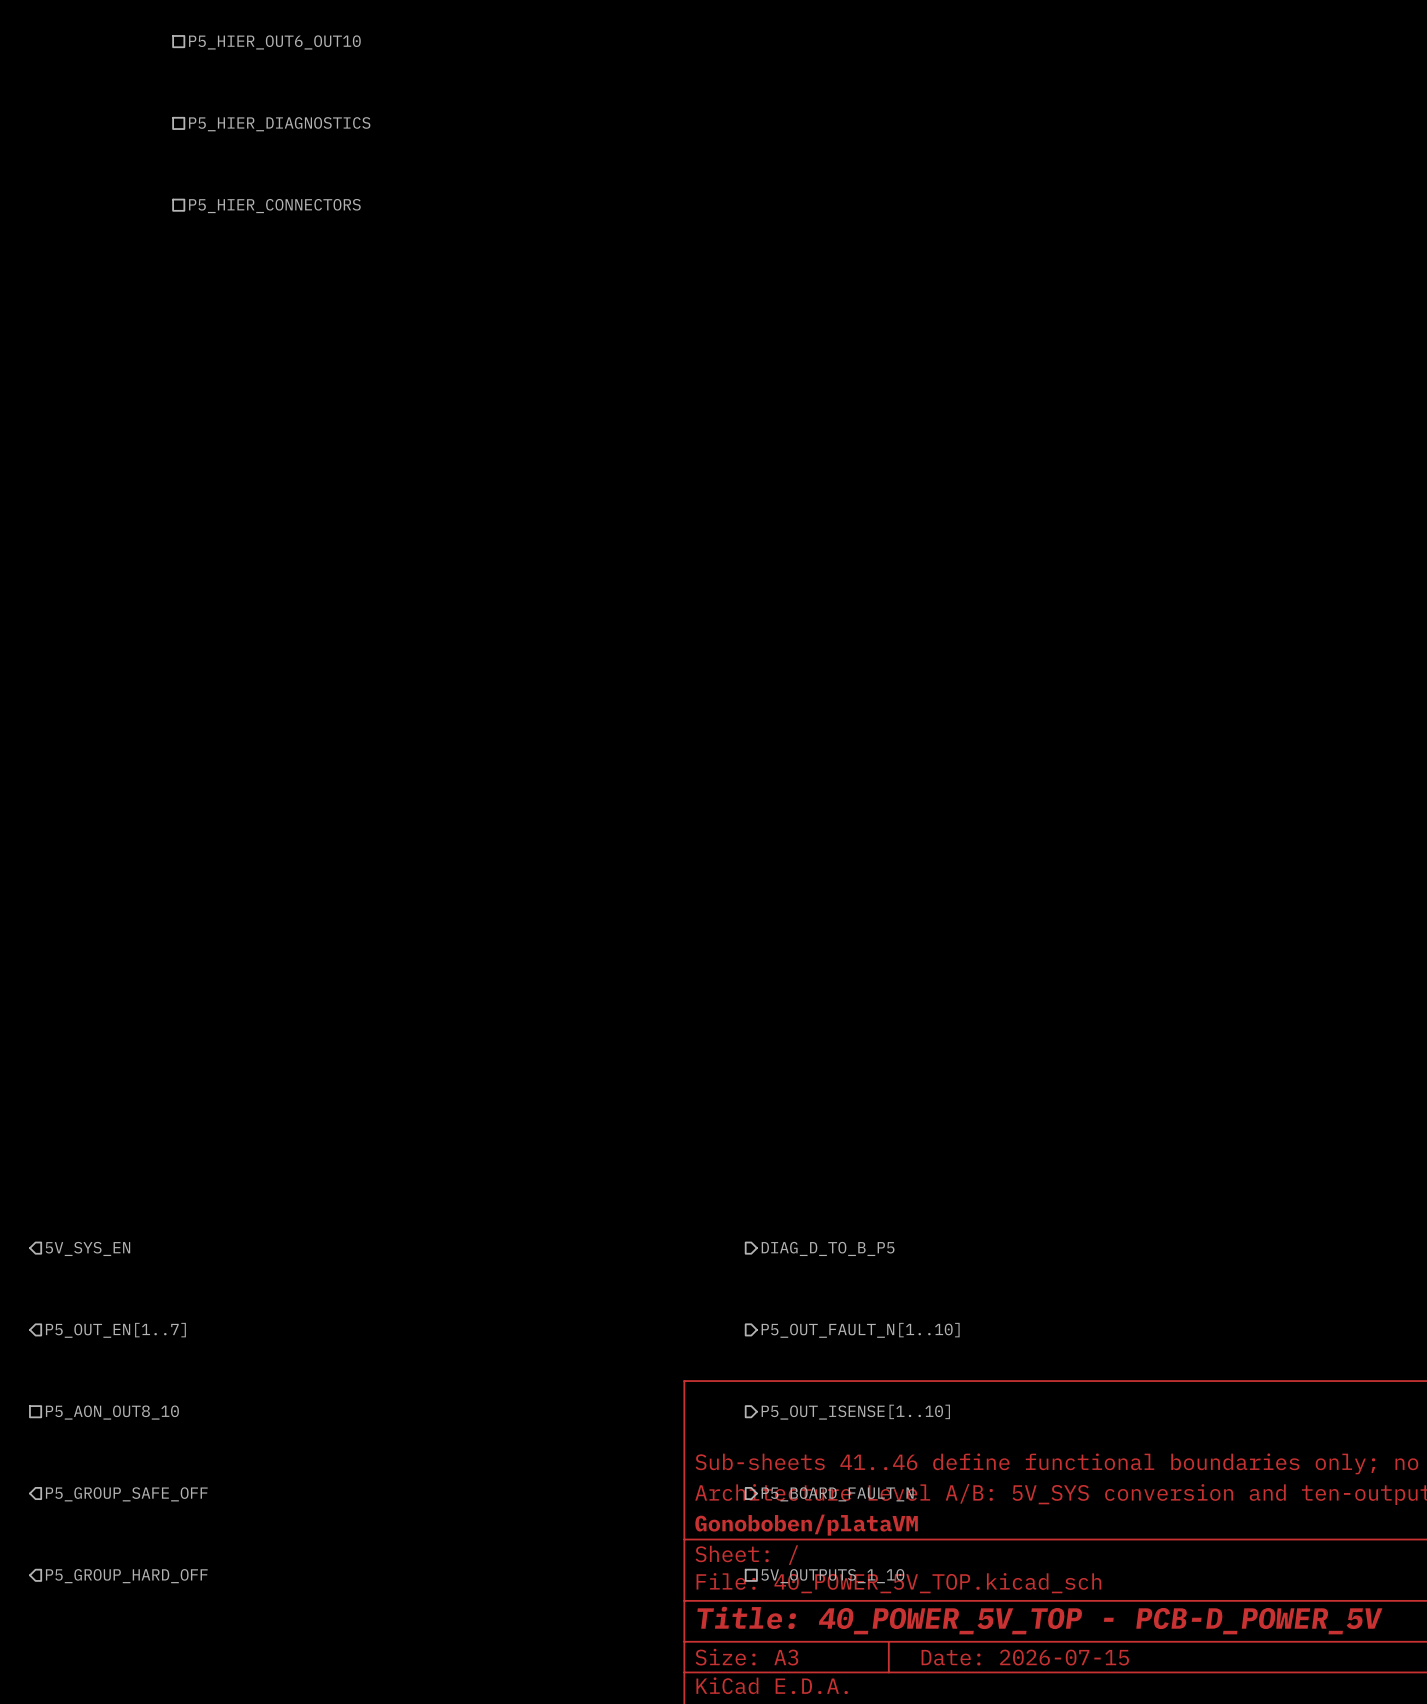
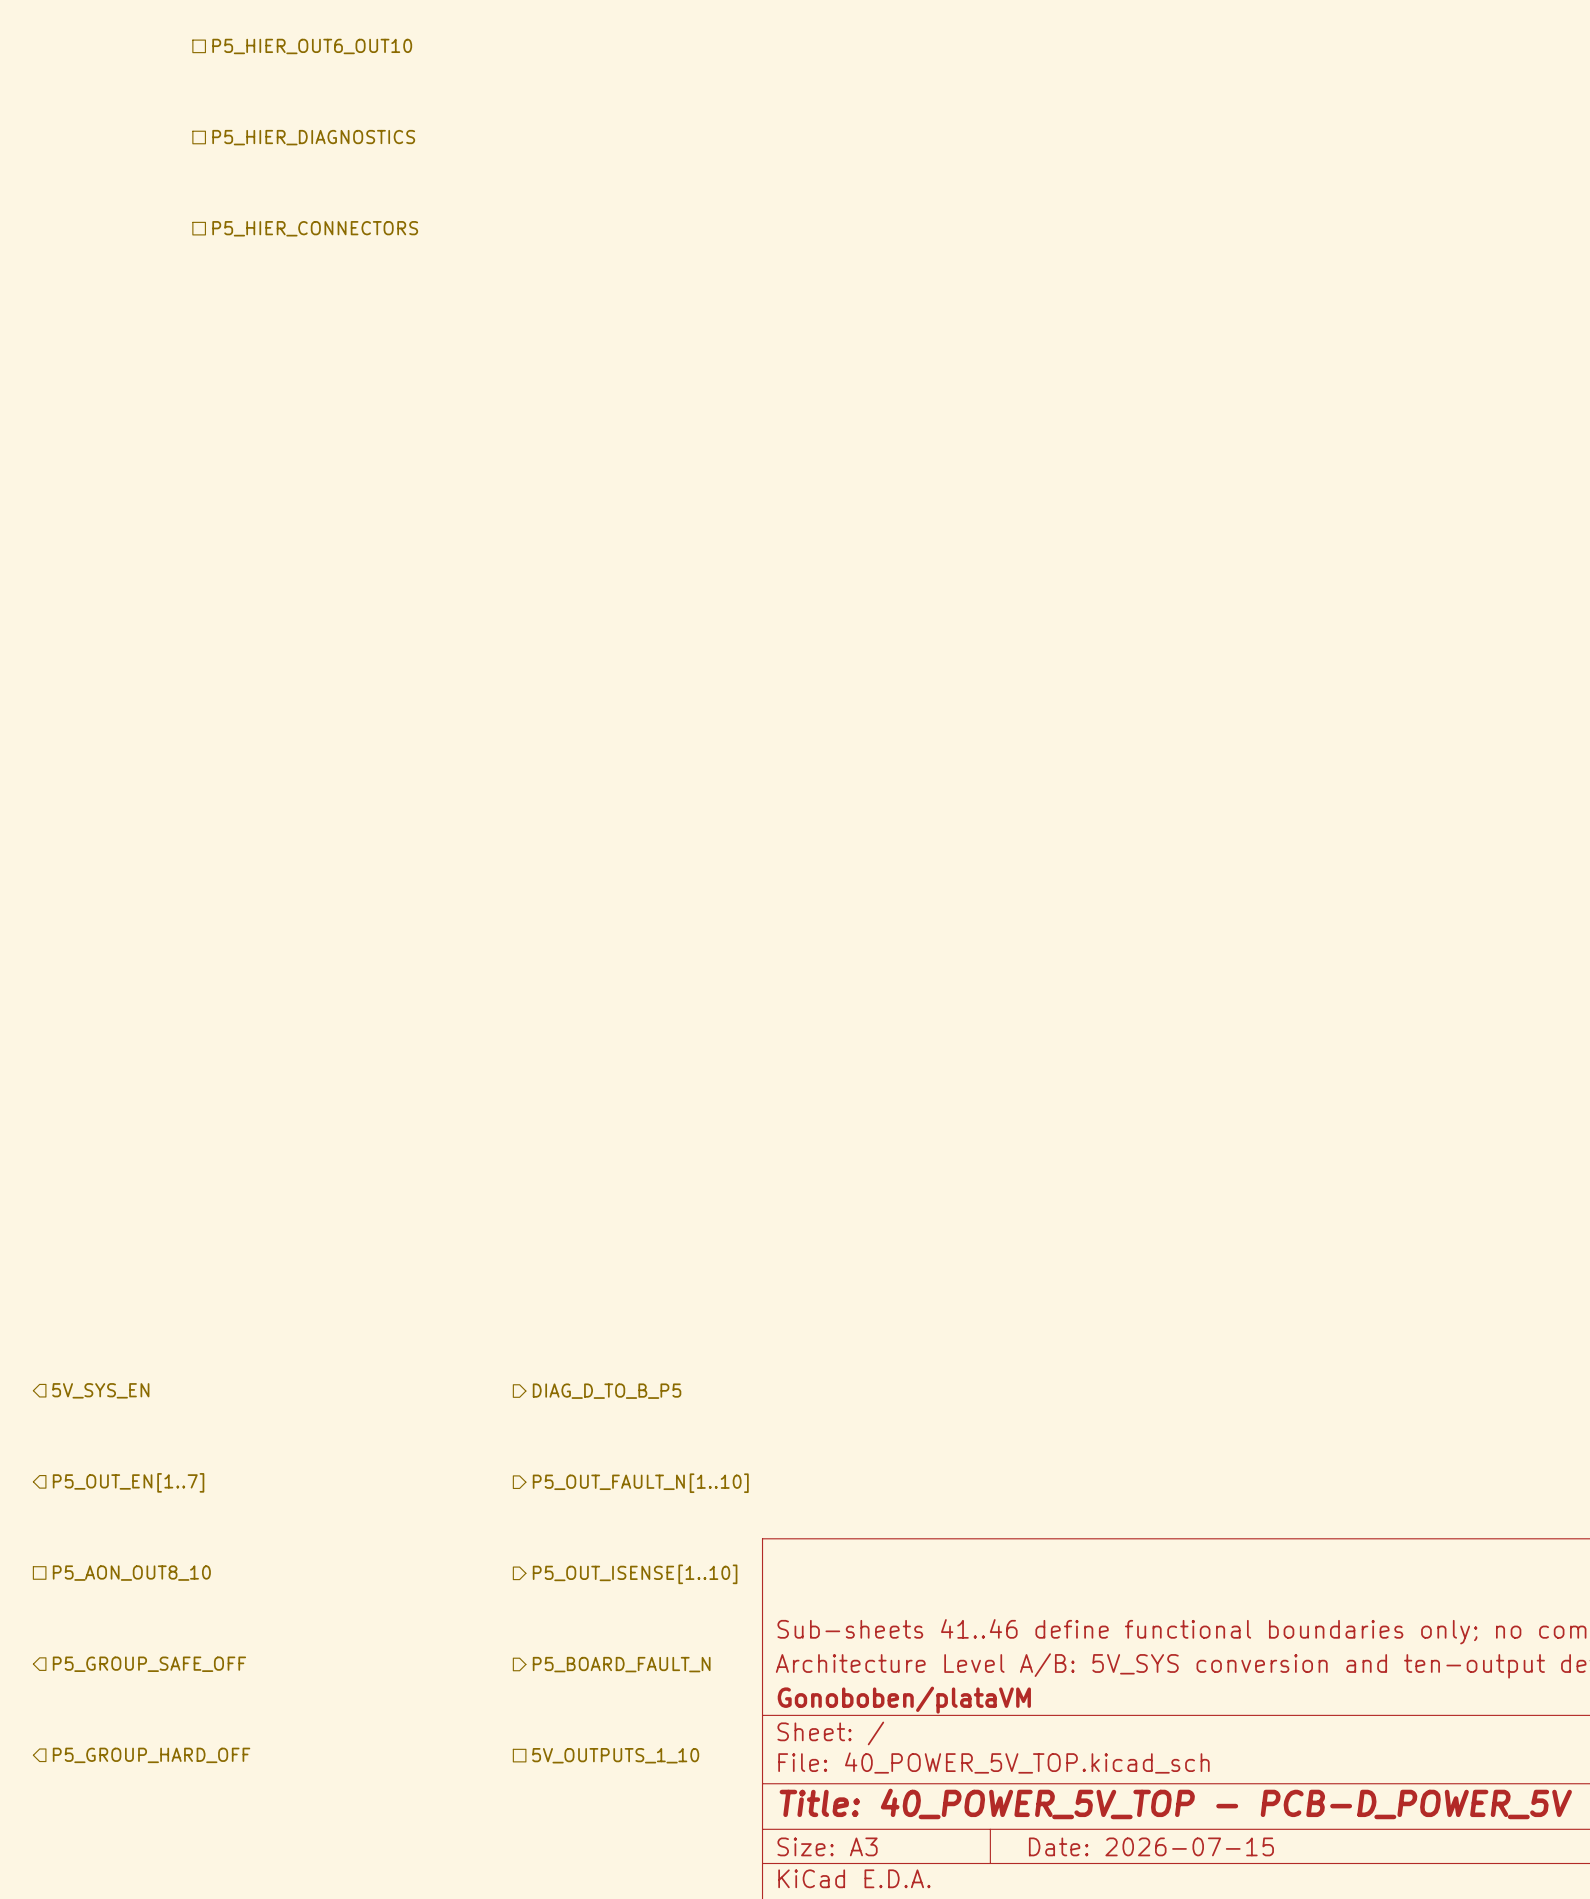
hierarchical label: DIAG_D_TO_B_P5 (828, 1248) -> none
hierarchical label: none -> DIAG_D_TO_B_P5 (607, 1391)
hierarchical label: none -> P5_OUT_FAULT_N[1..10] (640, 1483)
hierarchical label: P5_OUT_FAULT_N[1..10] (860, 1330) -> none
hierarchical label: none -> P5_OUT_ISENSE[1..10] (635, 1574)
hierarchical label: P5_OUT_ISENSE[1..10] (855, 1412) -> none
hierarchical label: none -> P5_BOARD_FAULT_N (621, 1664)
hierarchical label: P5_BOARD_FAULT_N (837, 1494) -> none
hierarchical label: none -> 5V_OUTPUTS_1_10 (615, 1755)
hierarchical label: 5V_OUTPUTS_1_10 (832, 1576) -> none

